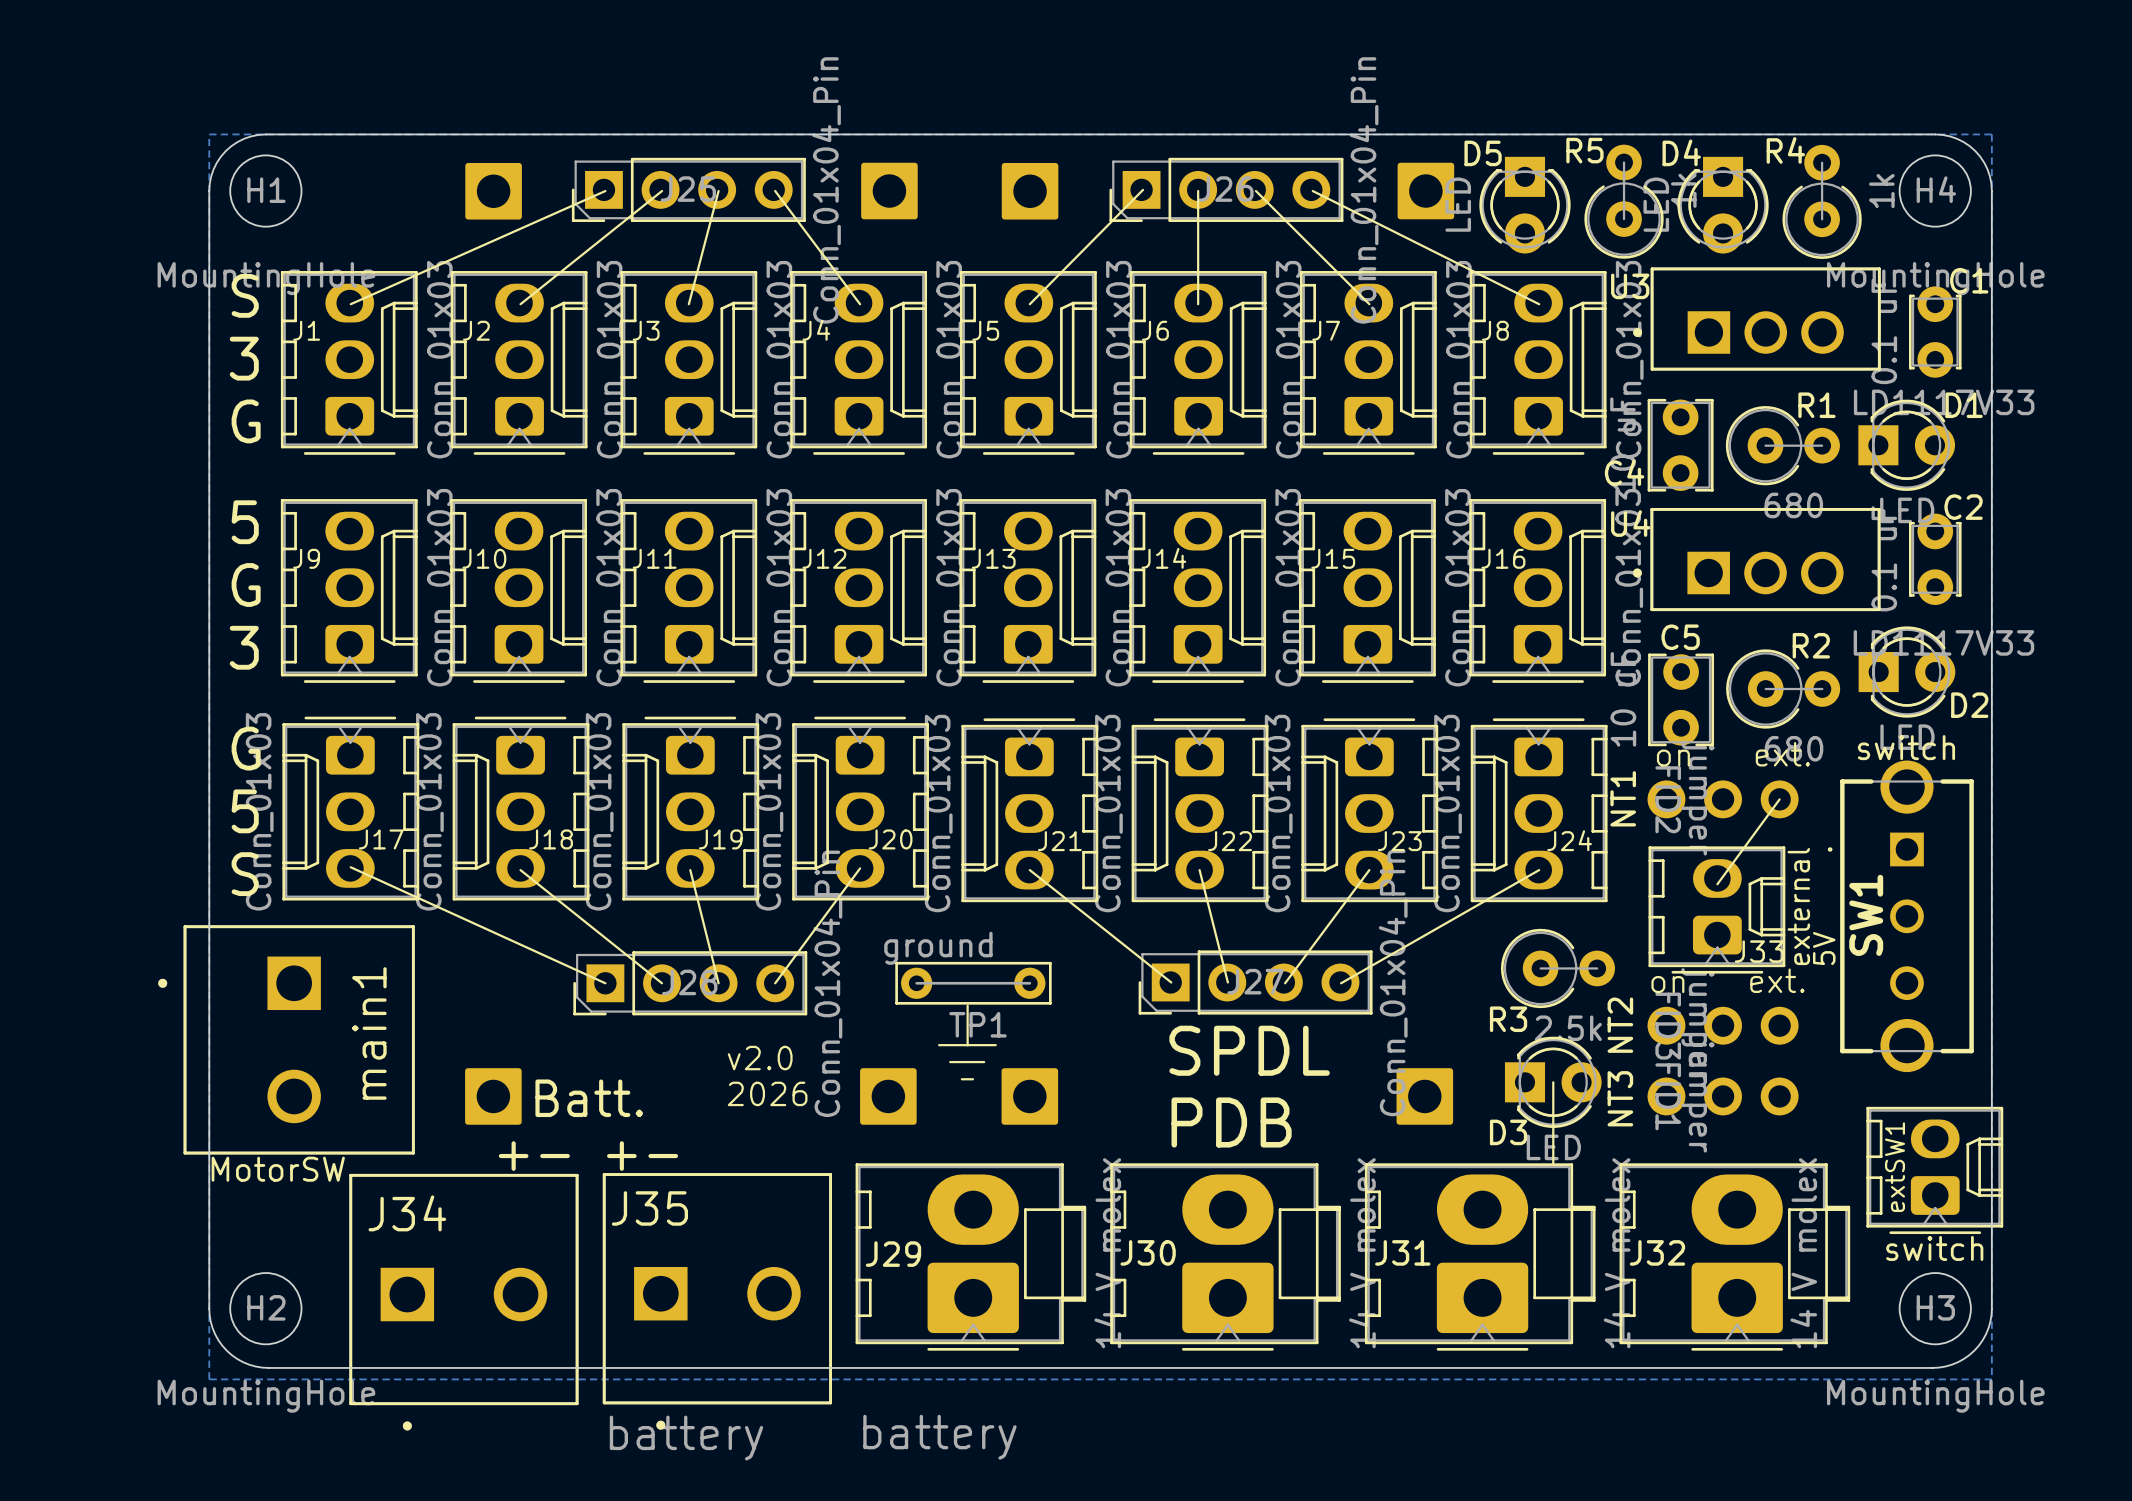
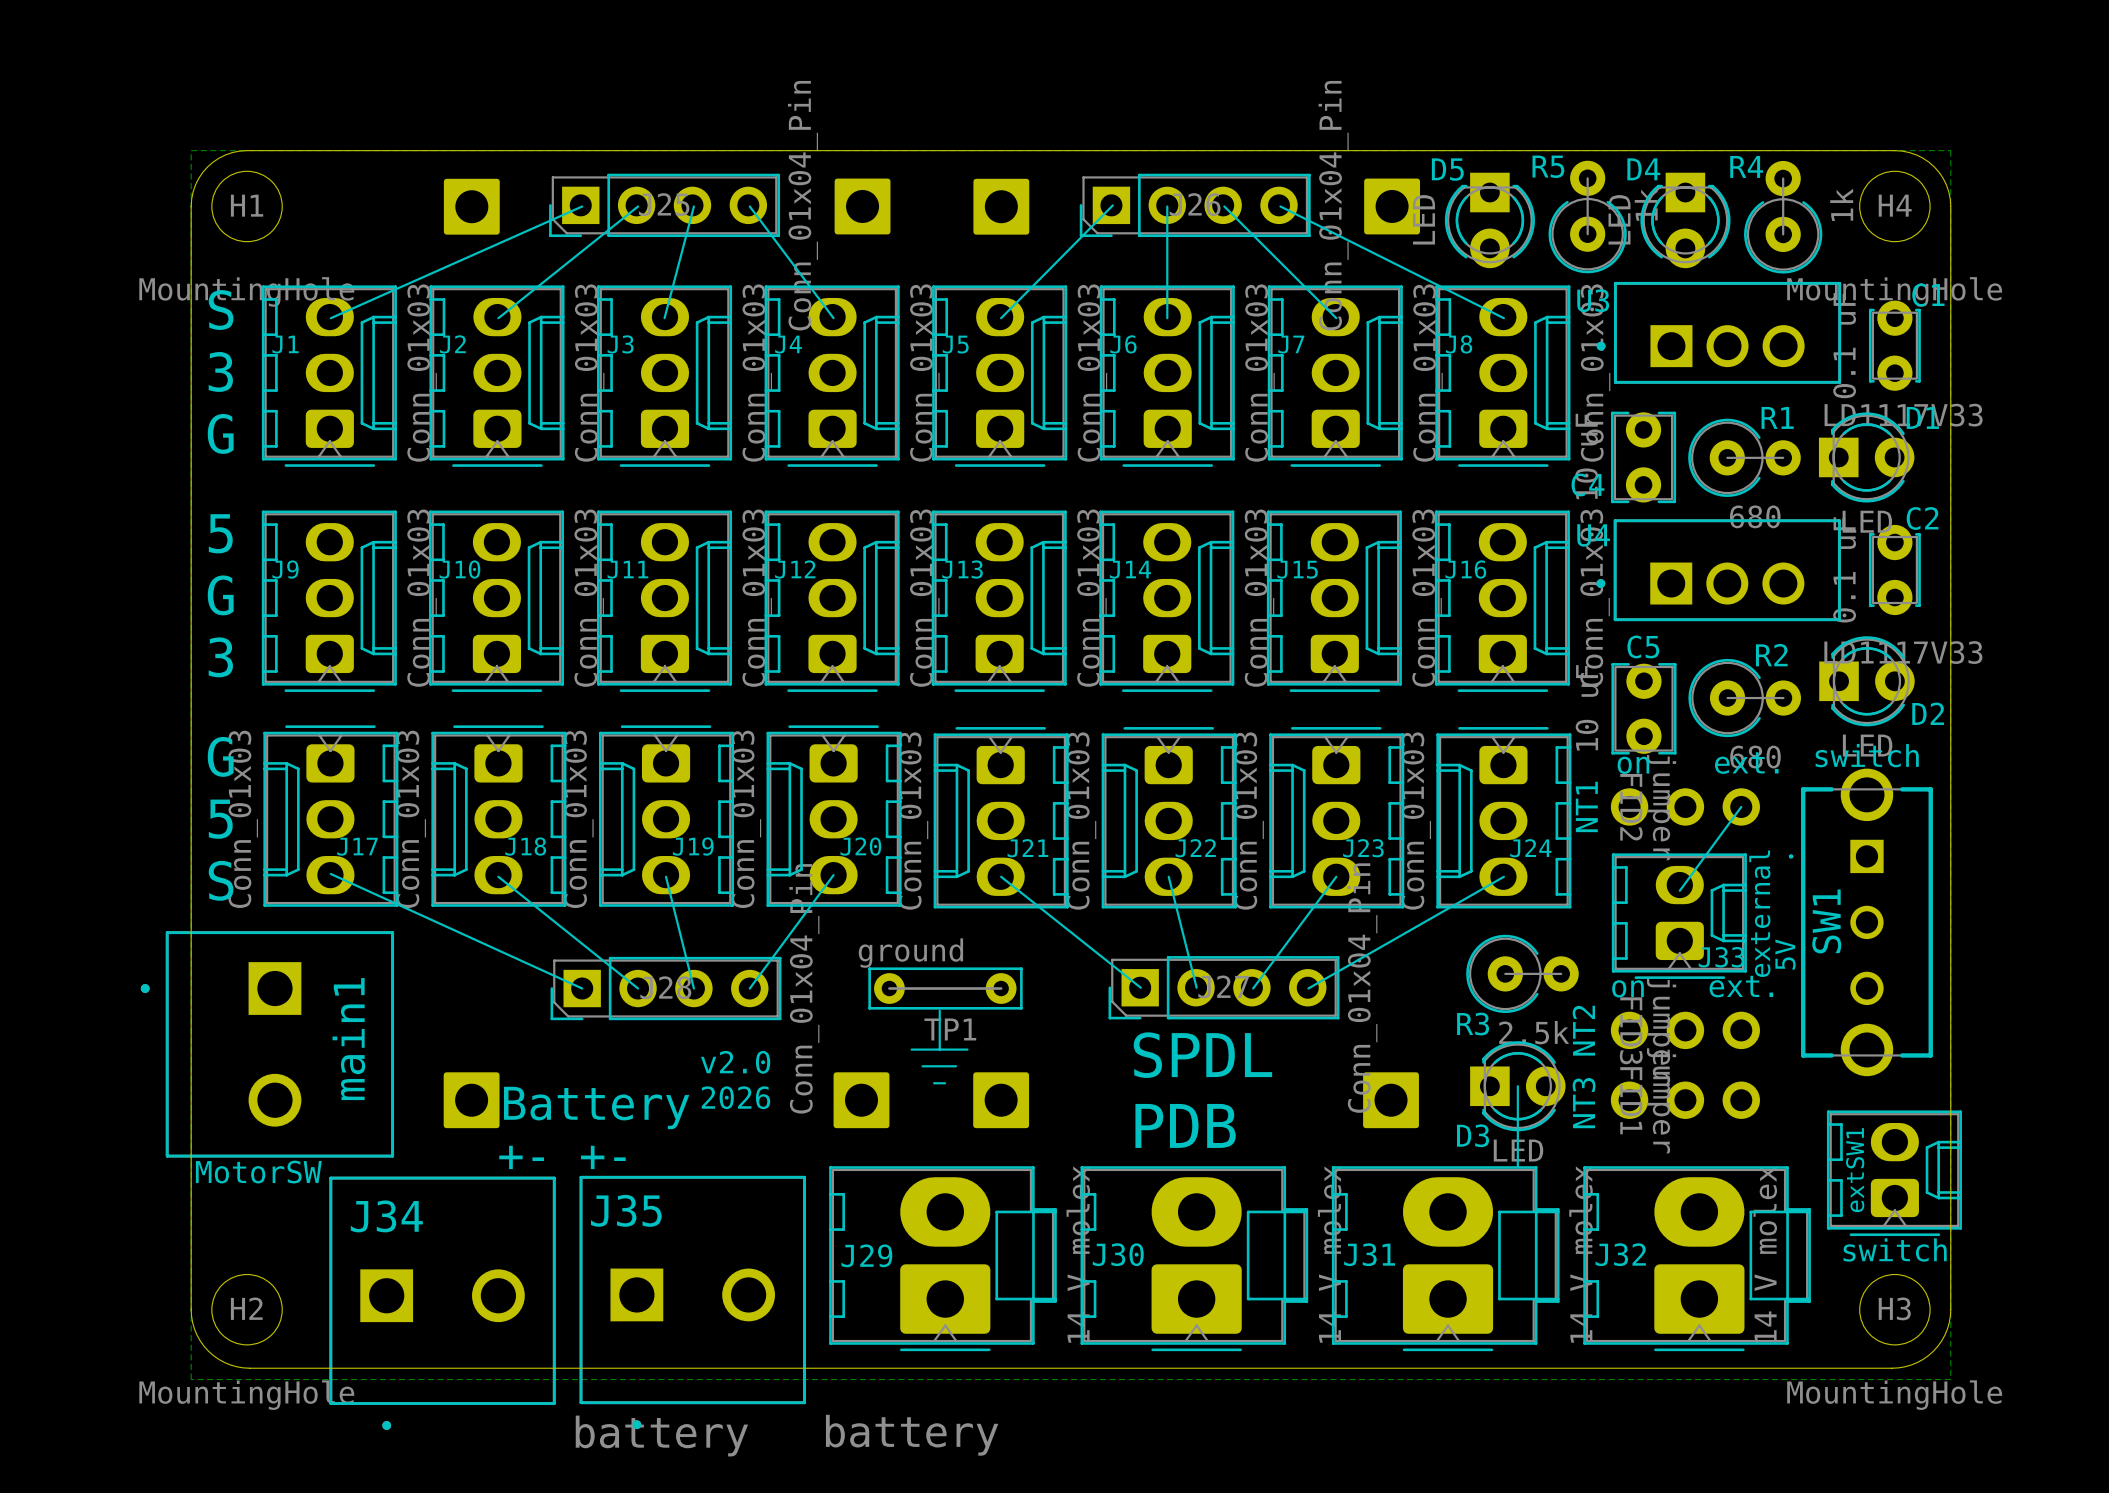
text: Batt. (589, 1098) -> Battery (596, 1107)

